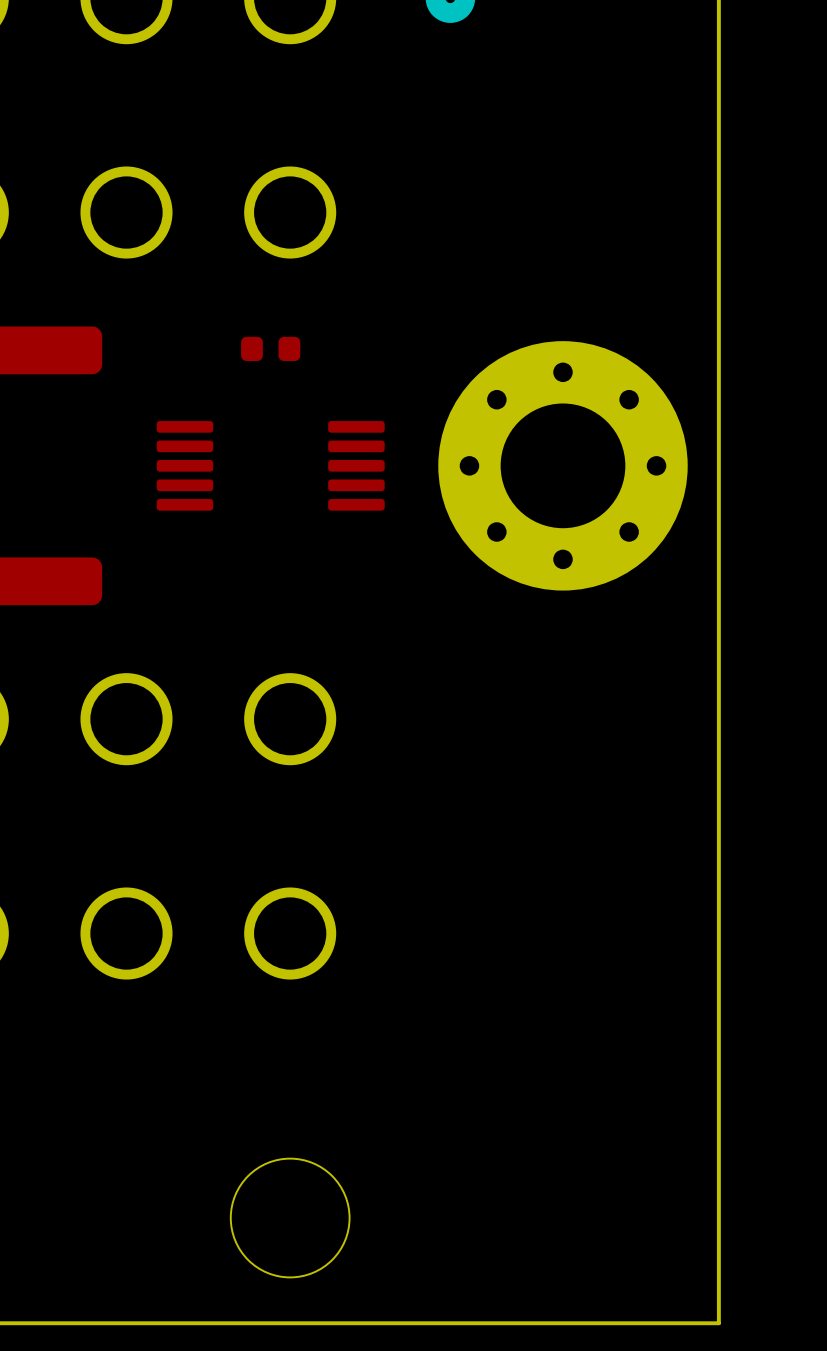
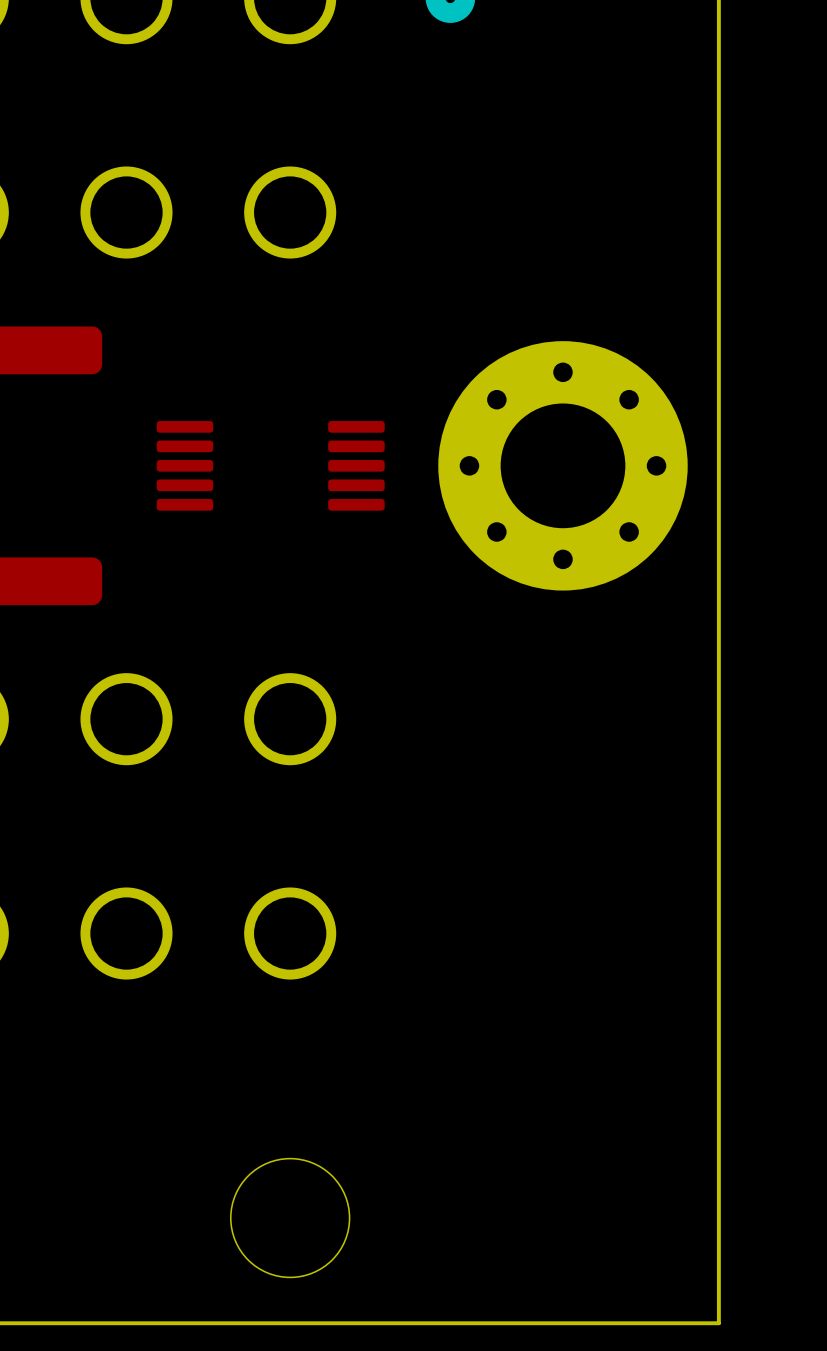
part: (270, 348) -> none

